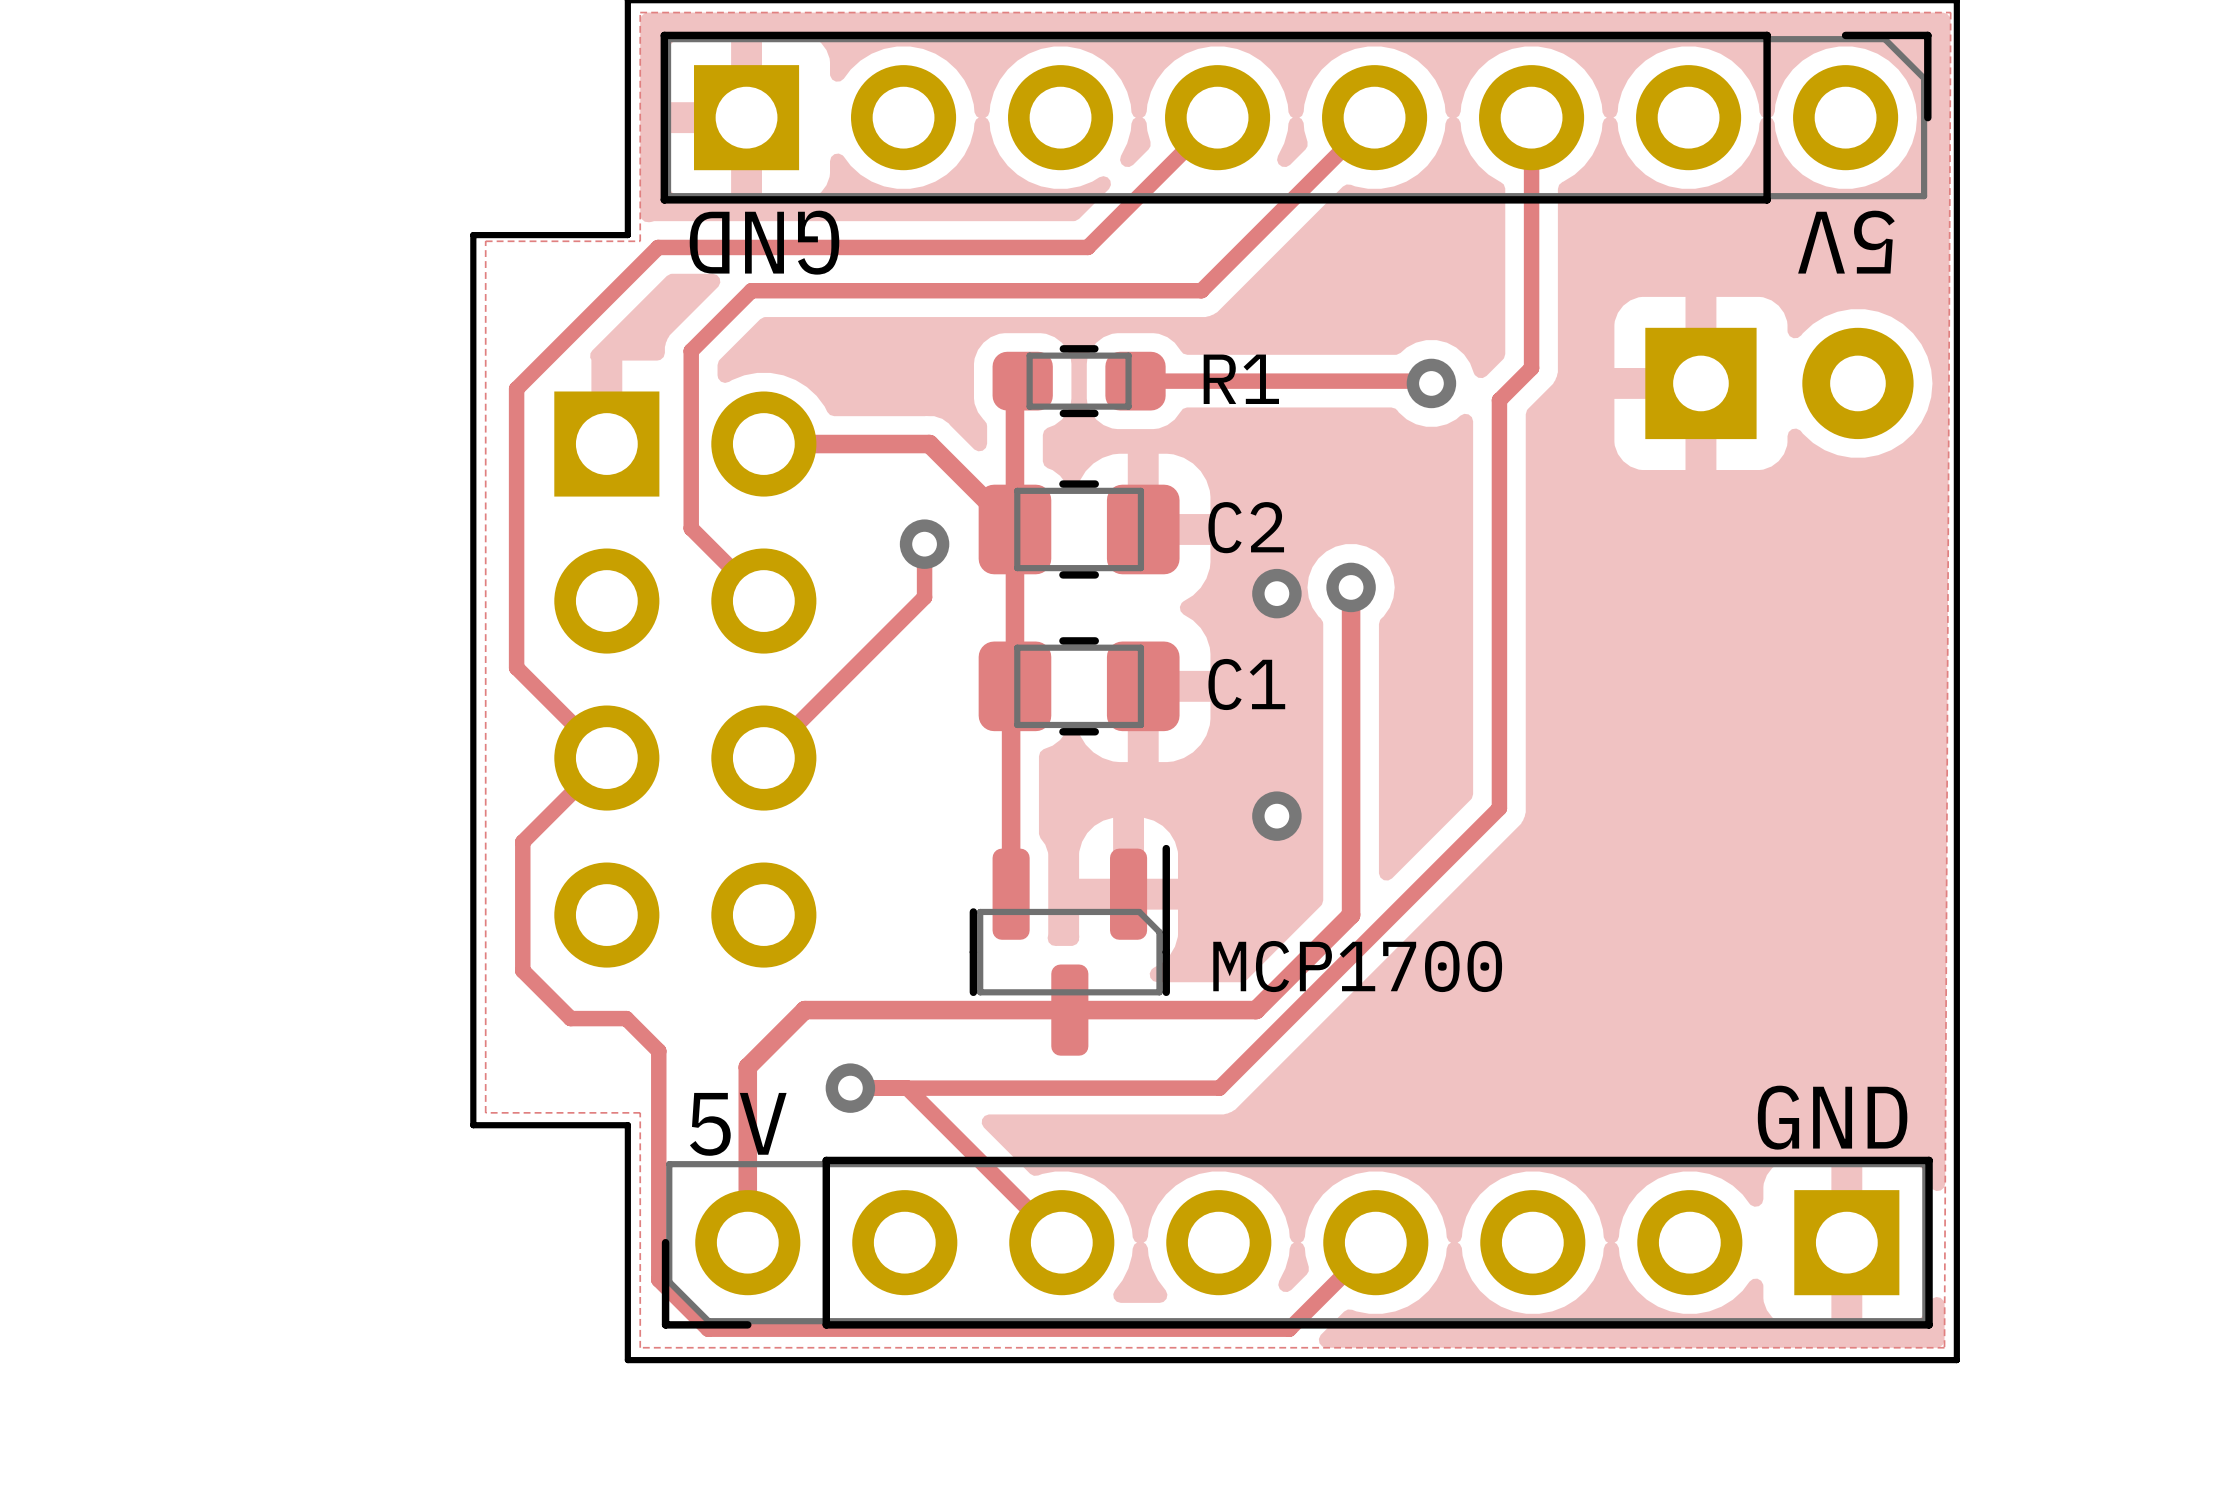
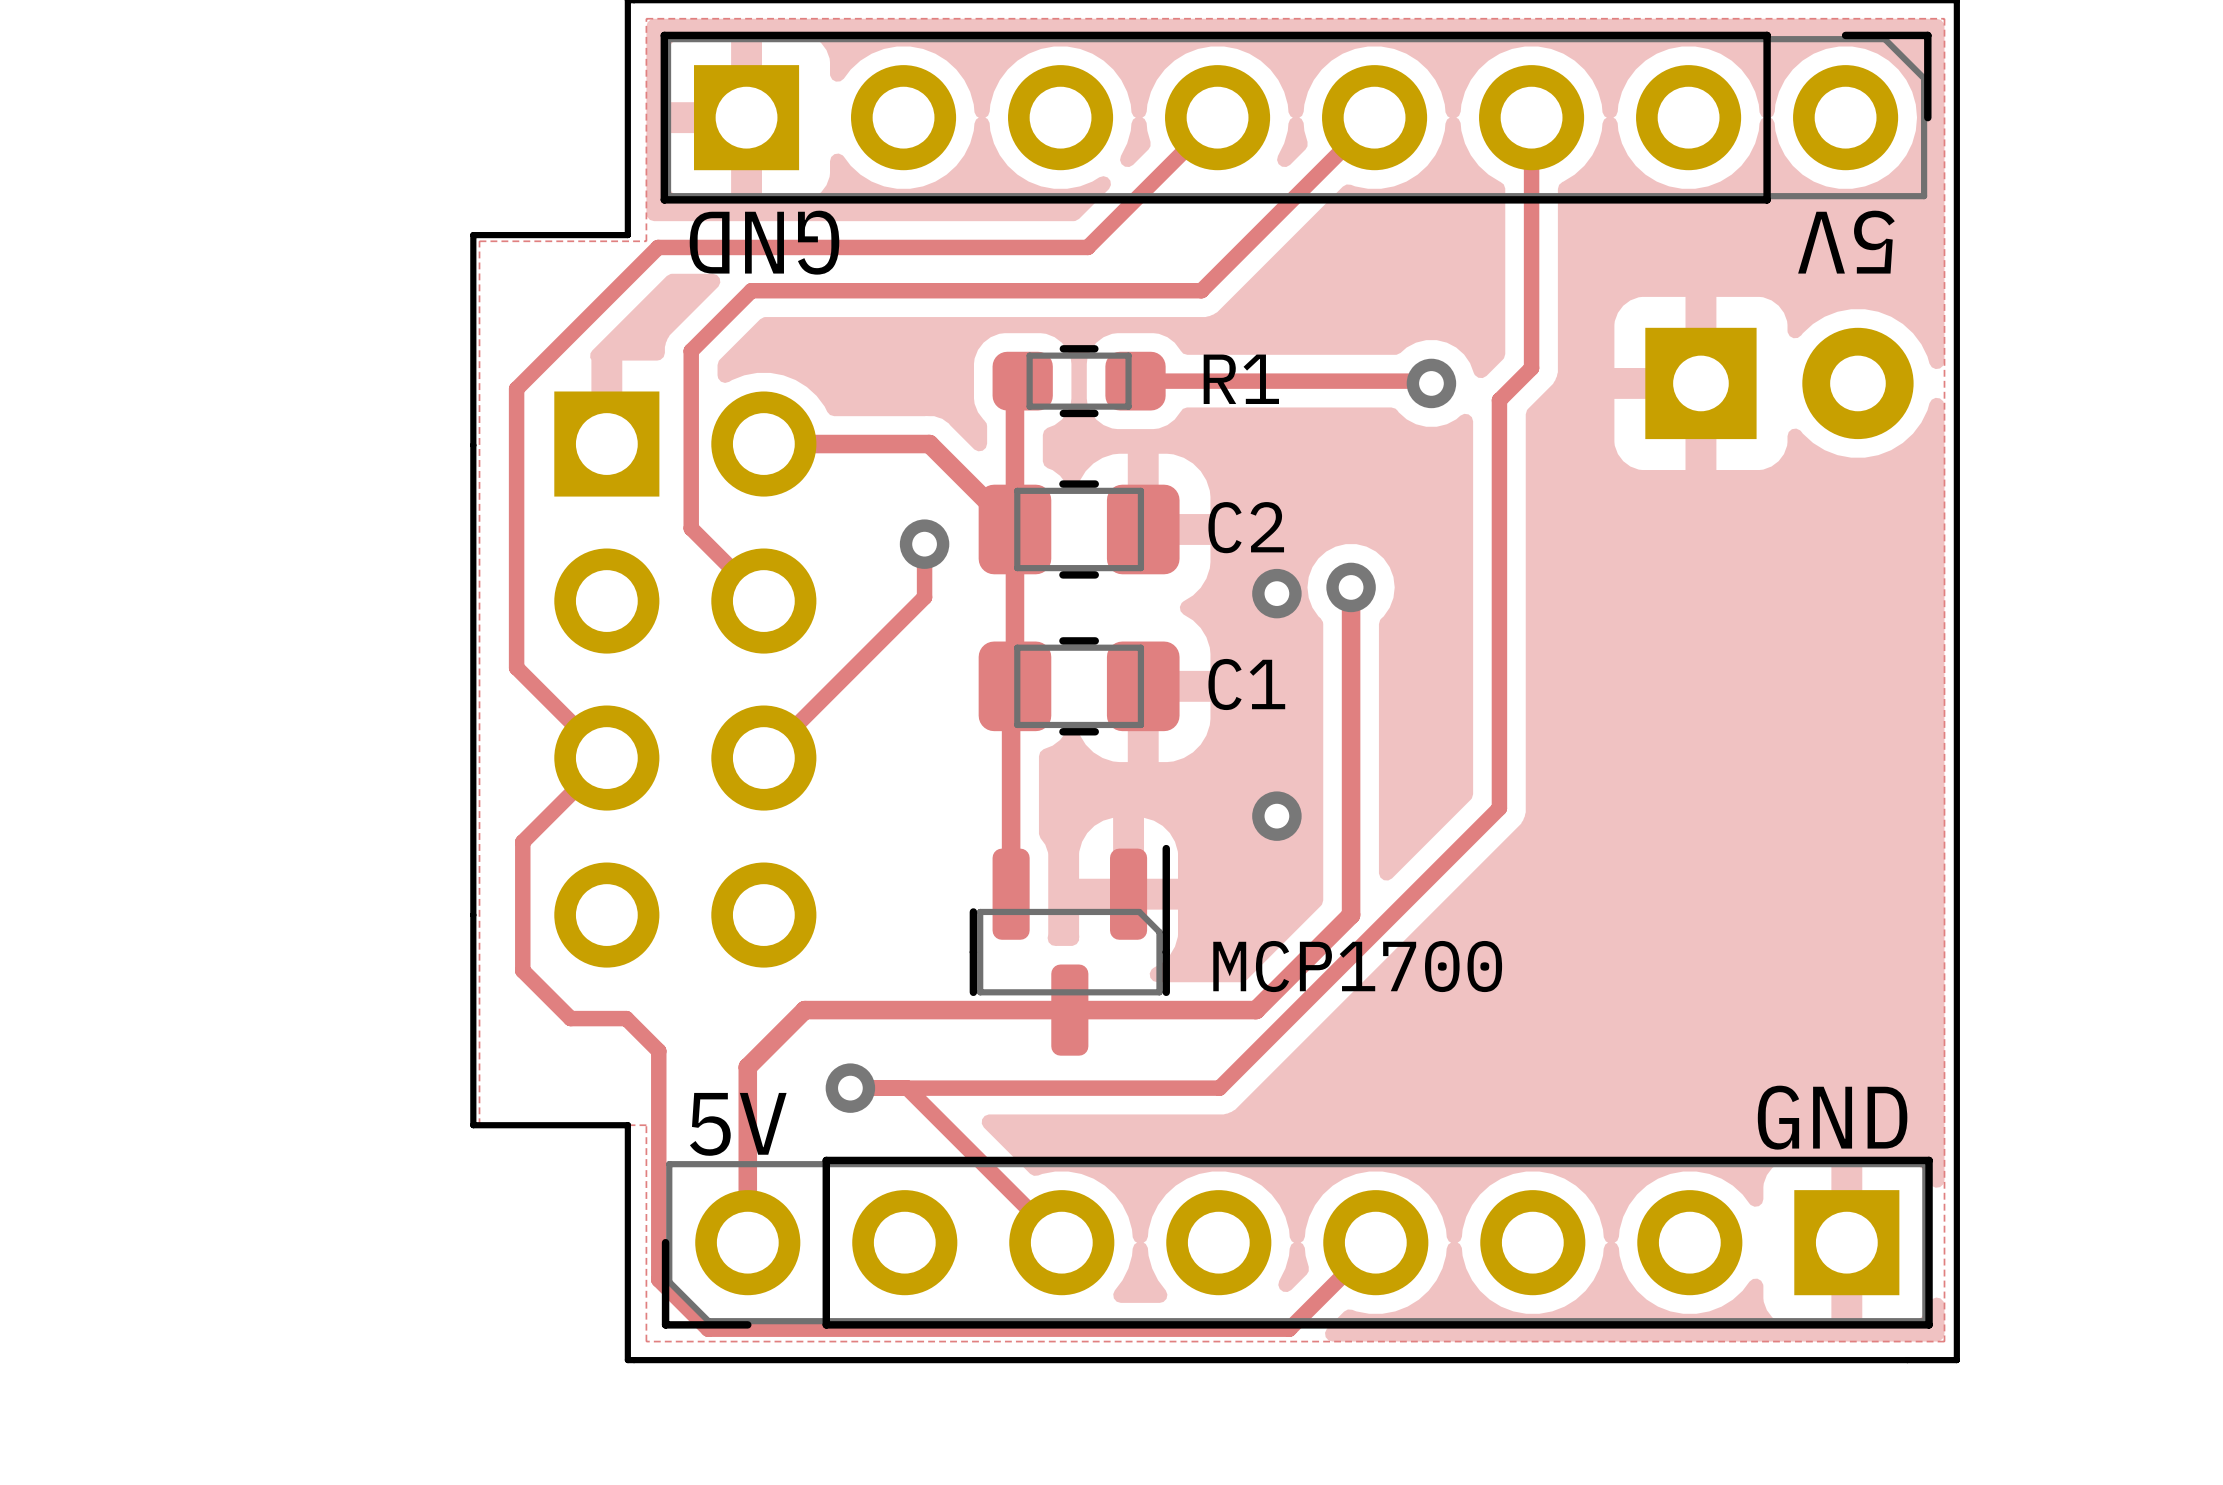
zone outline: (485, 241) (485, 1112) (640, 1112) (640, 1347) (1944, 1347) (1950, 12) (640, 12) (640, 241) -> (485, 241) (479, 241) (479, 1125) (646, 1125) (646, 1341) (1944, 1341) (1944, 18) (646, 18) (646, 241) (640, 241)

